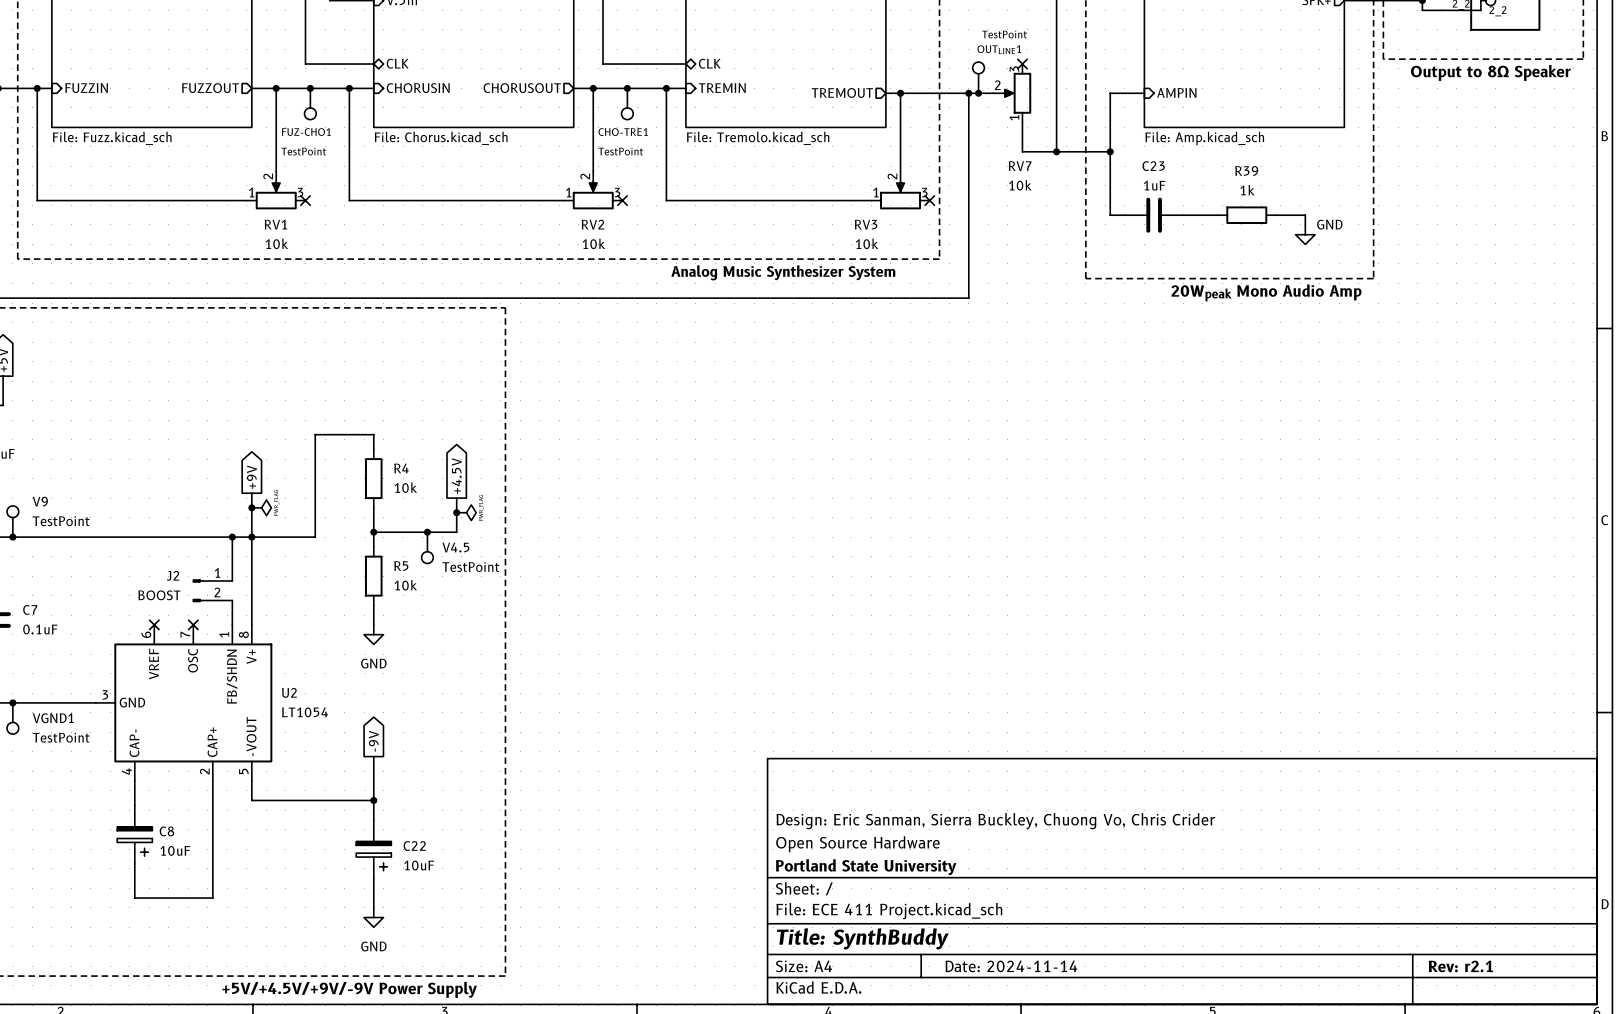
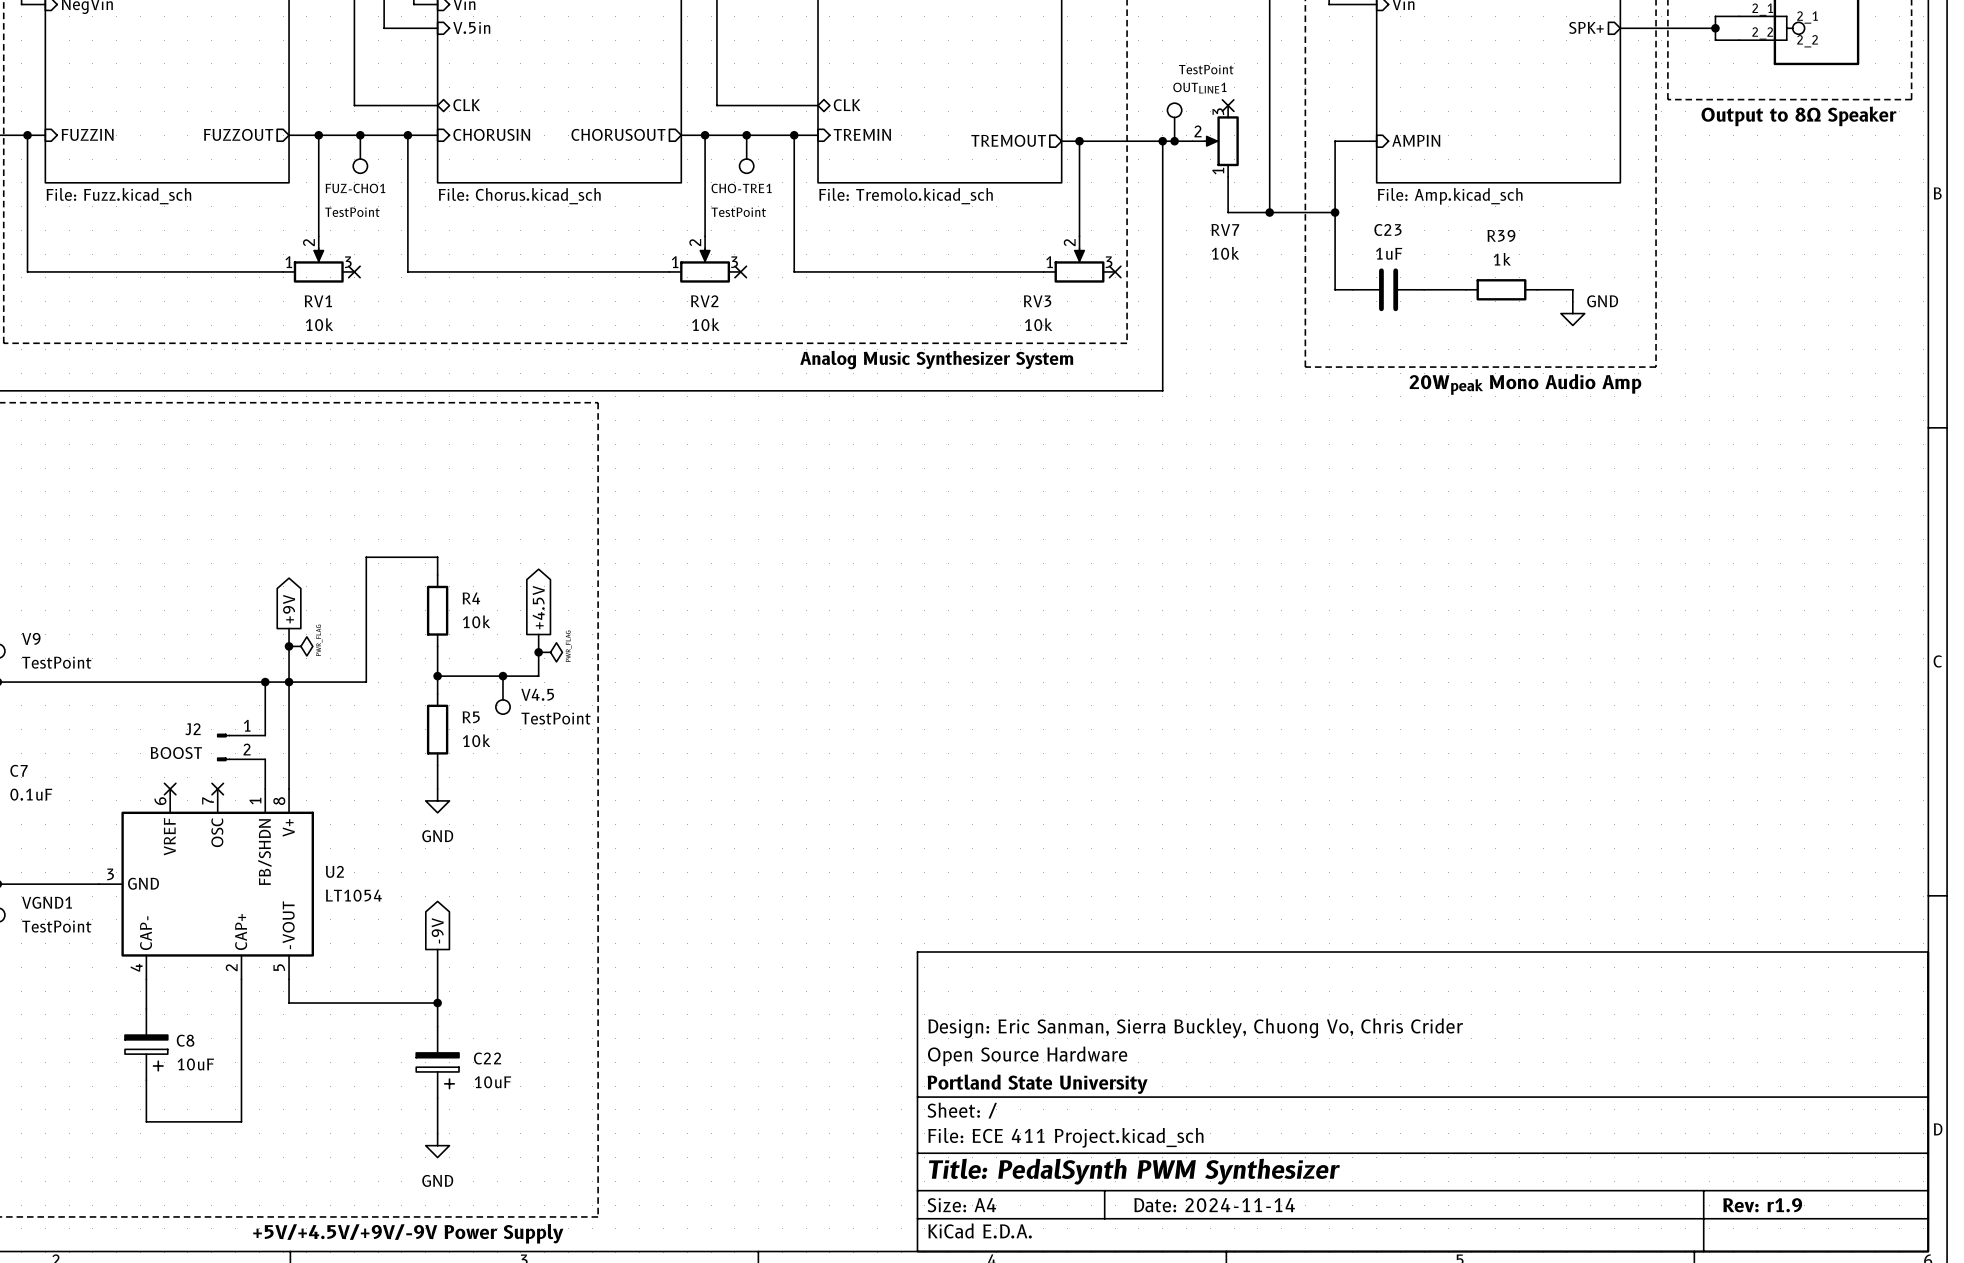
title block: Title: SynthBuddy (862, 938) -> Title: PedalSynth PWM Synthesizer (1134, 1171)
title block: Rev: r2.1 (1460, 966) -> Rev: r1.9 (1762, 1205)

